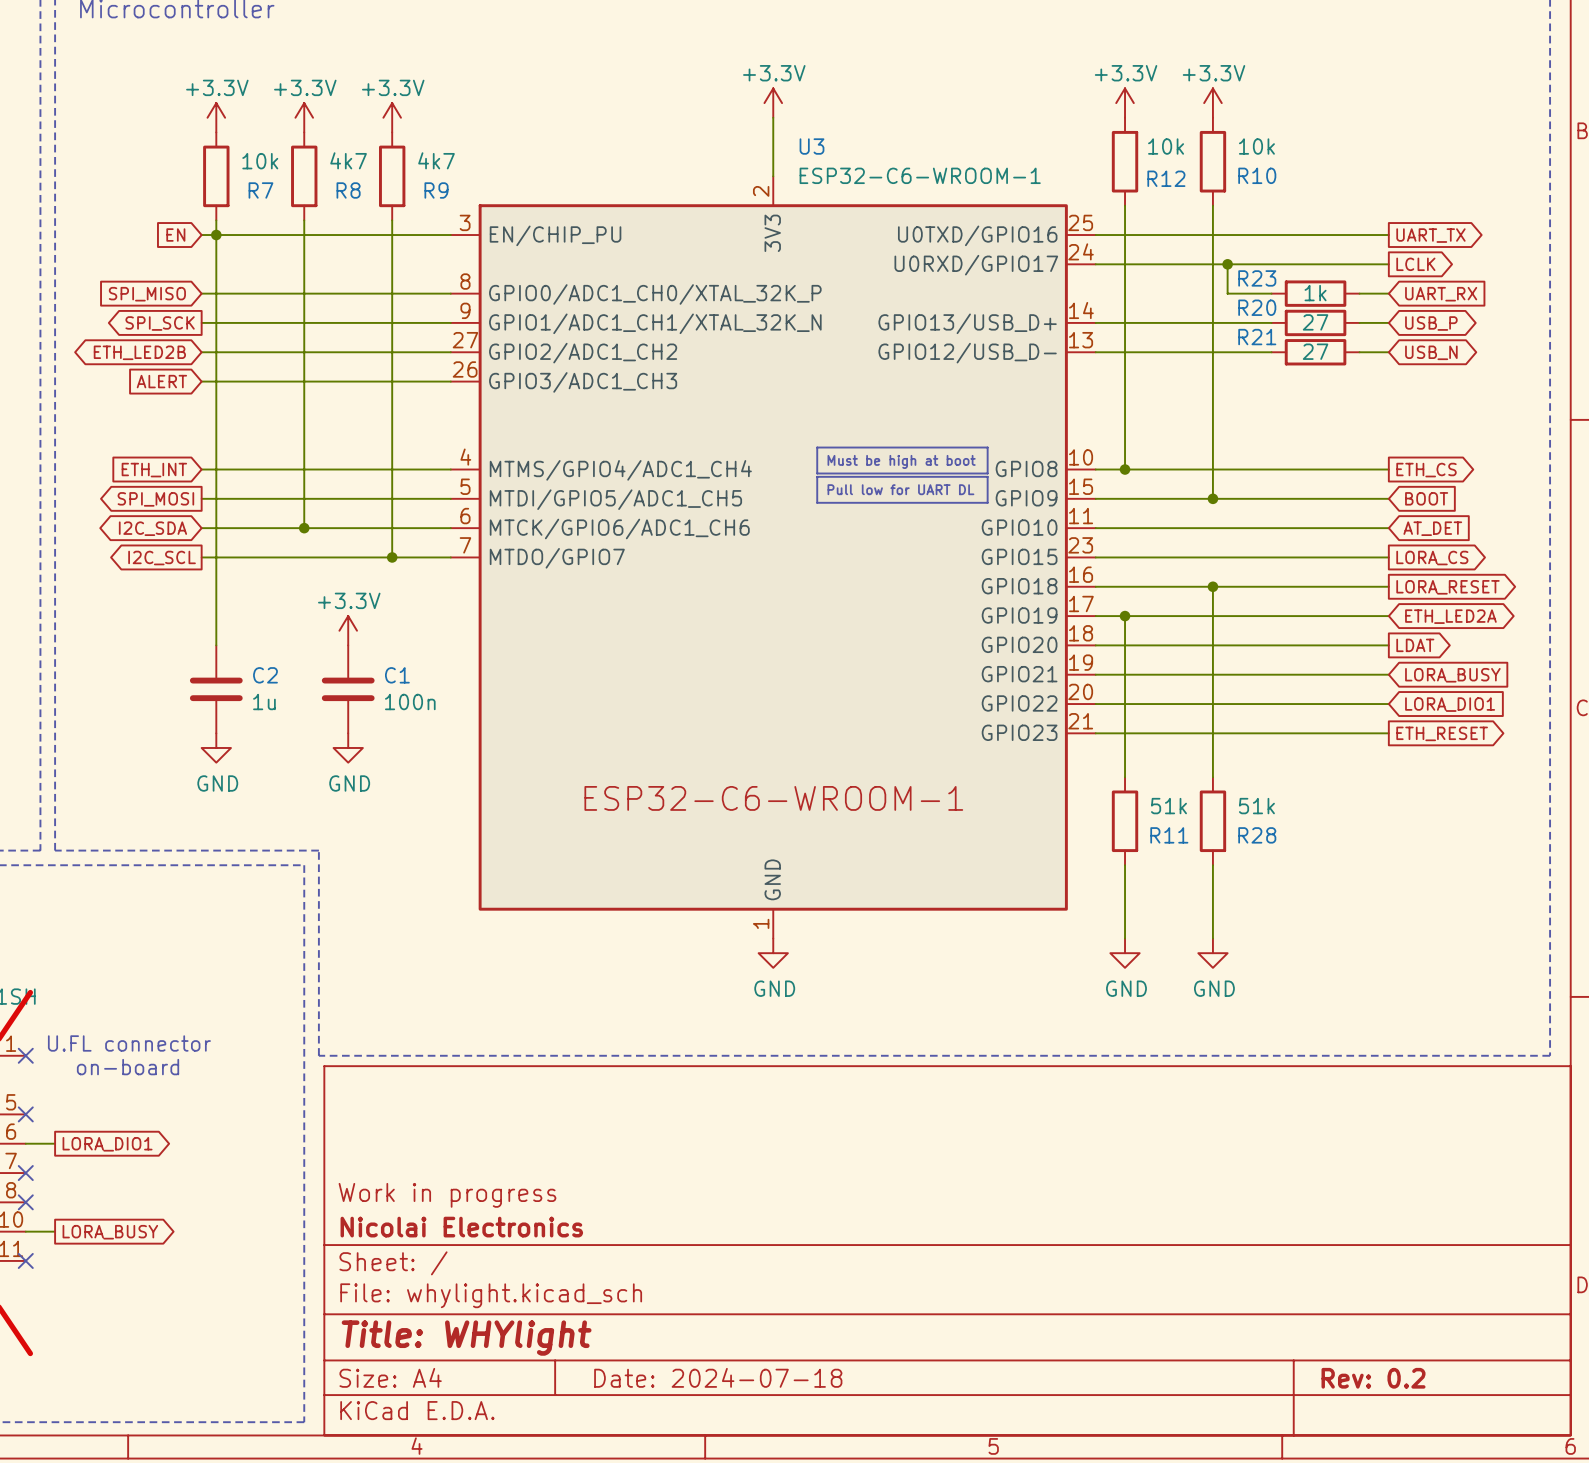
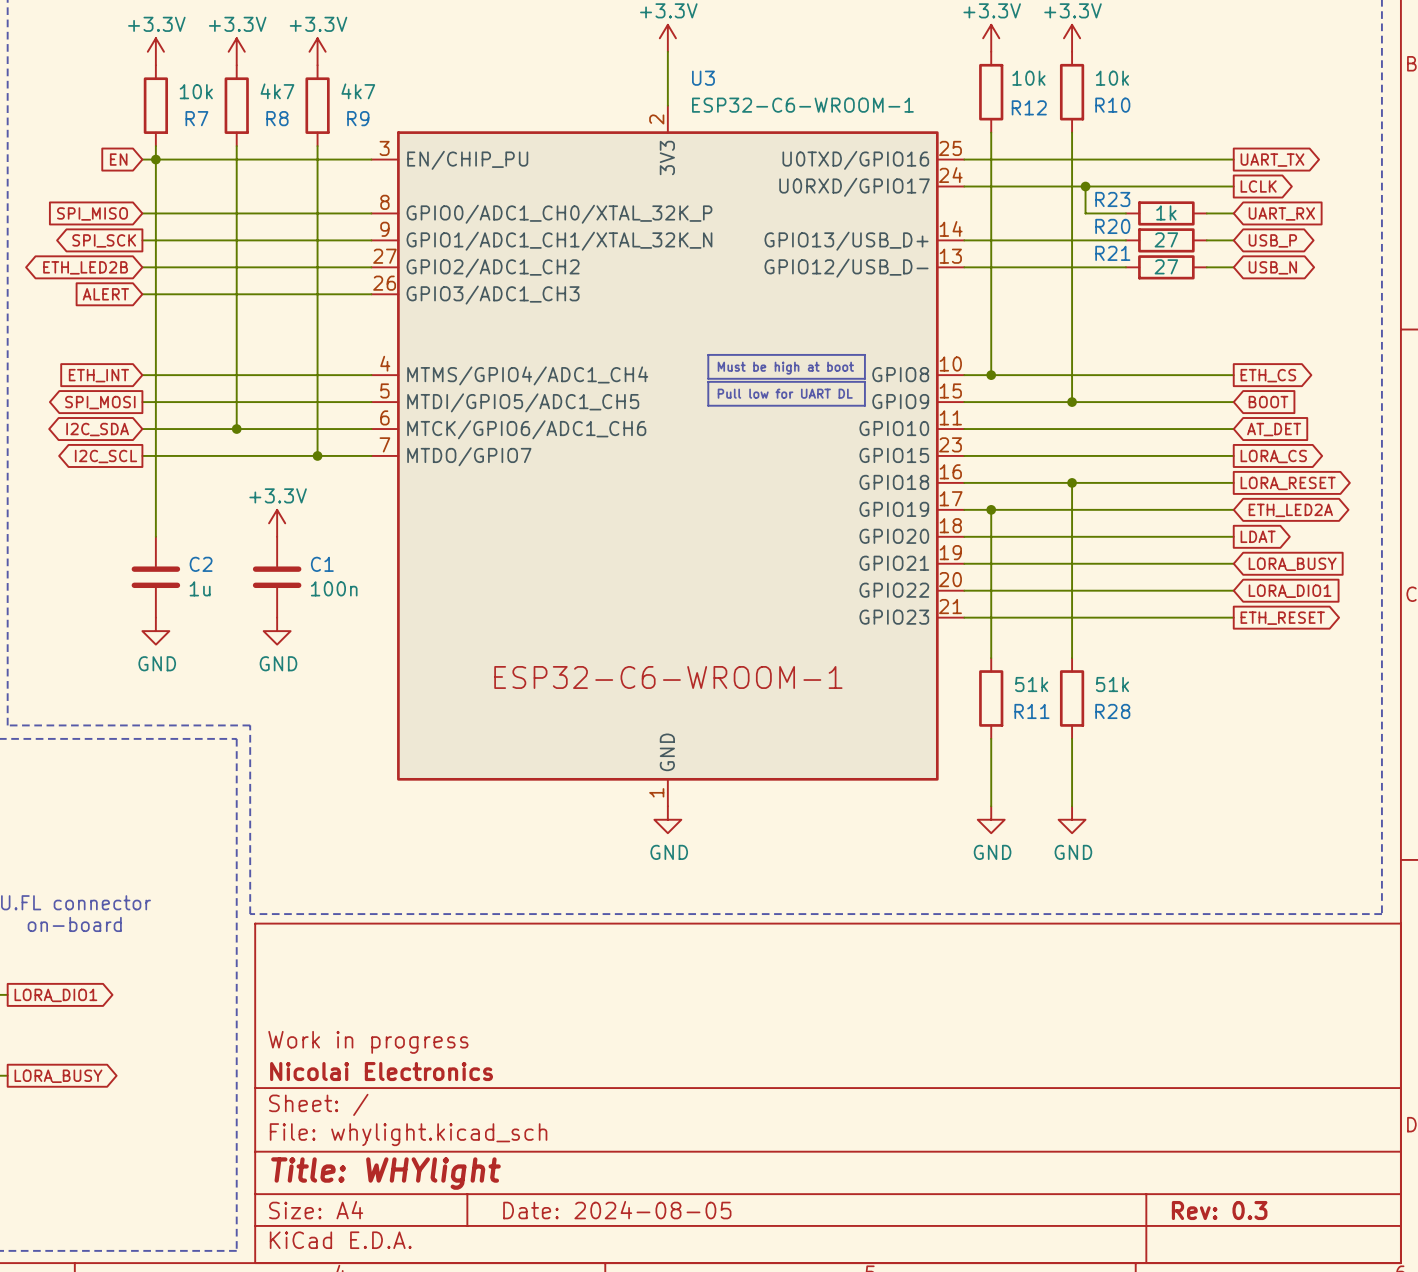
title block: Date: 2024-07-18 (718, 1377) -> Date: 2024-08-05 (617, 1210)
title block: Rev: 0.2 (1373, 1378) -> Rev: 0.3 (1219, 1210)

